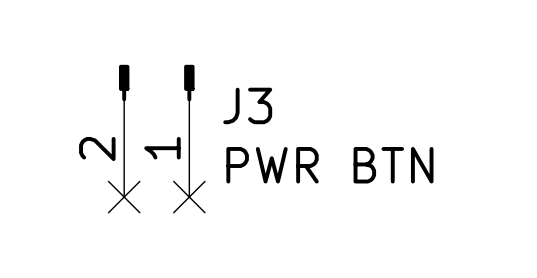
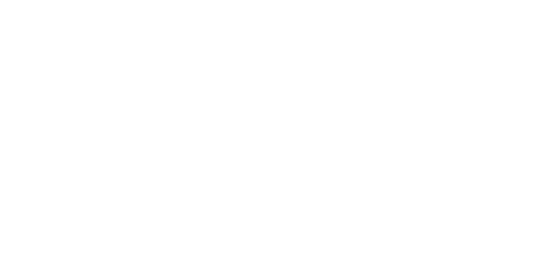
J3: PWR BTN (156, 130) -> none
no-connect mark: (124, 197) -> none
no-connect mark: (189, 197) -> none

